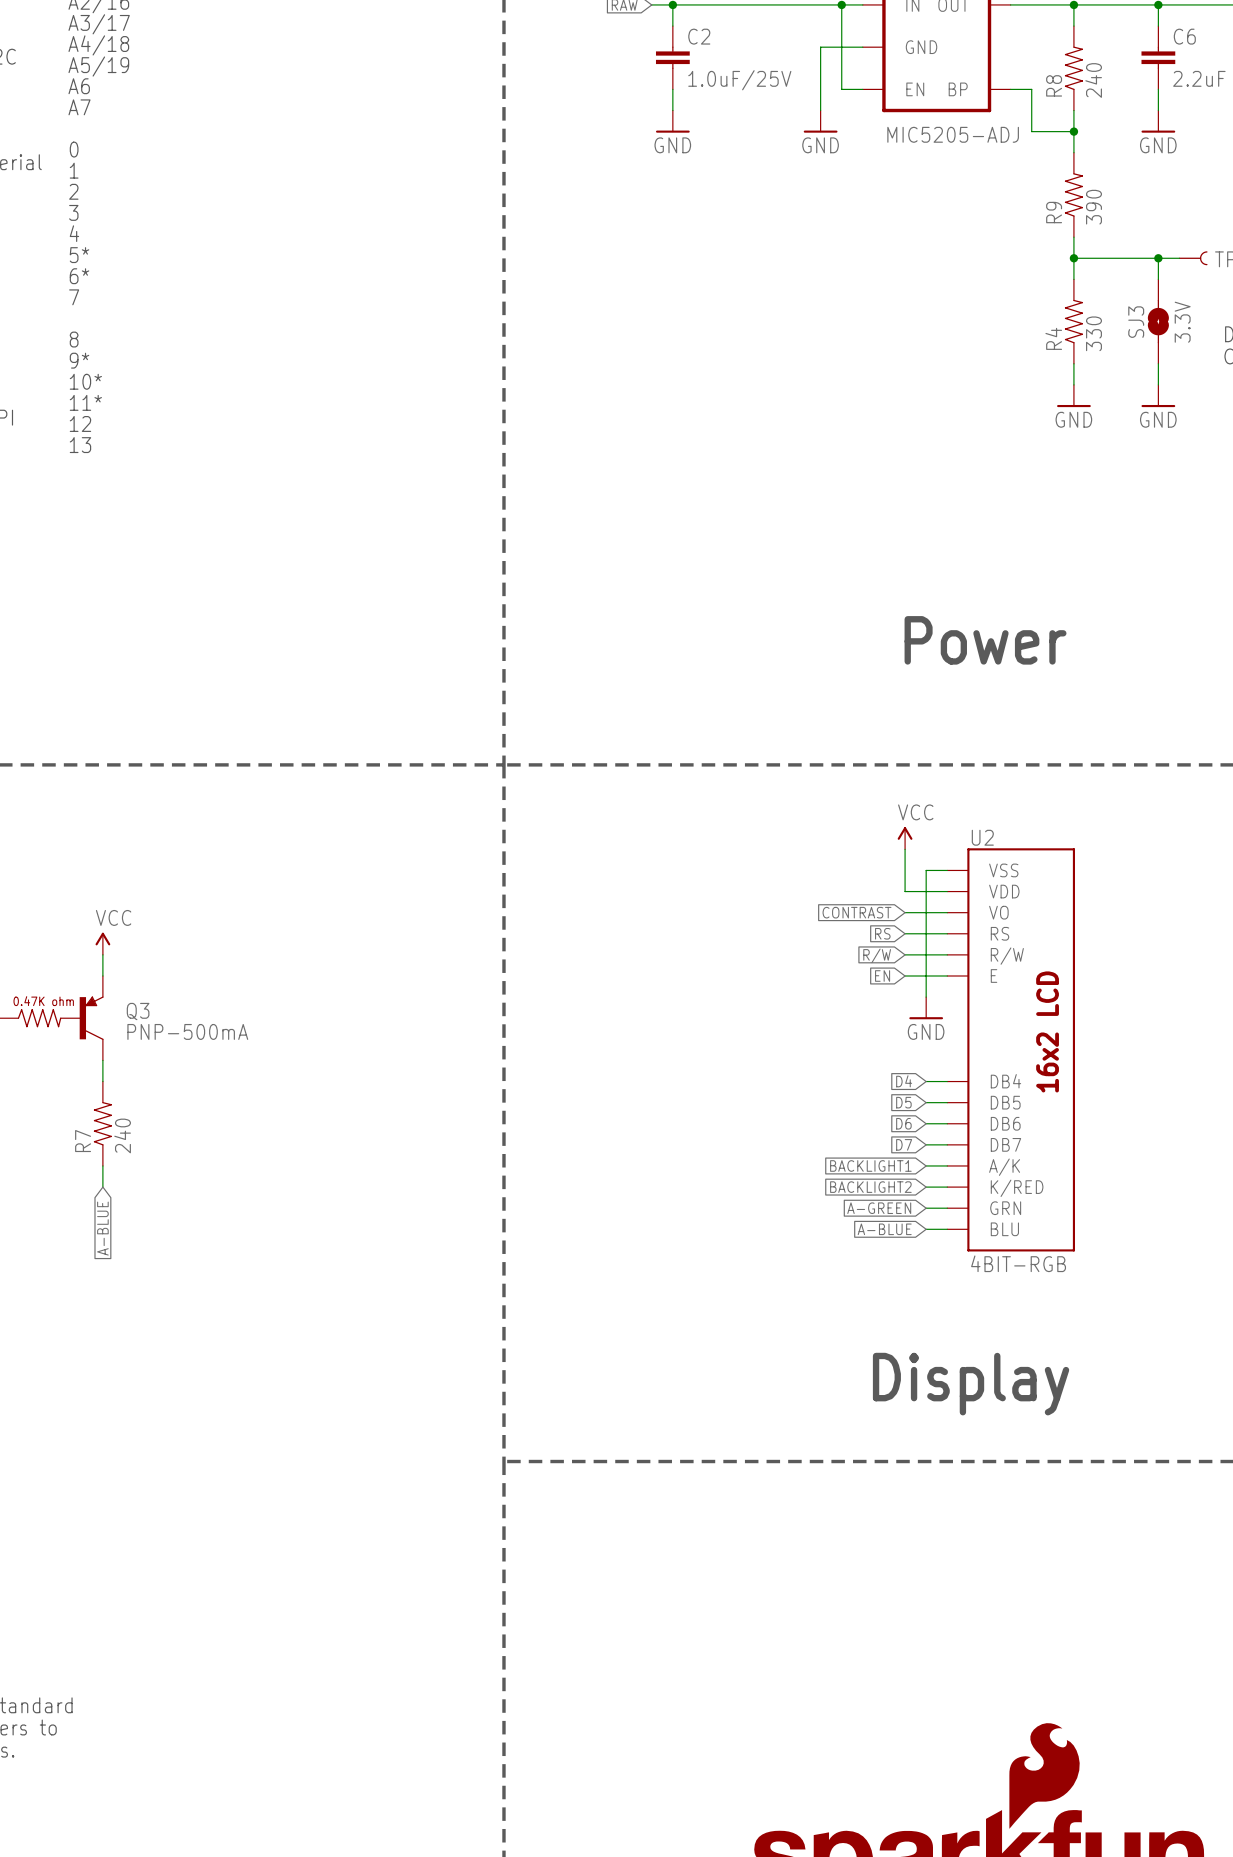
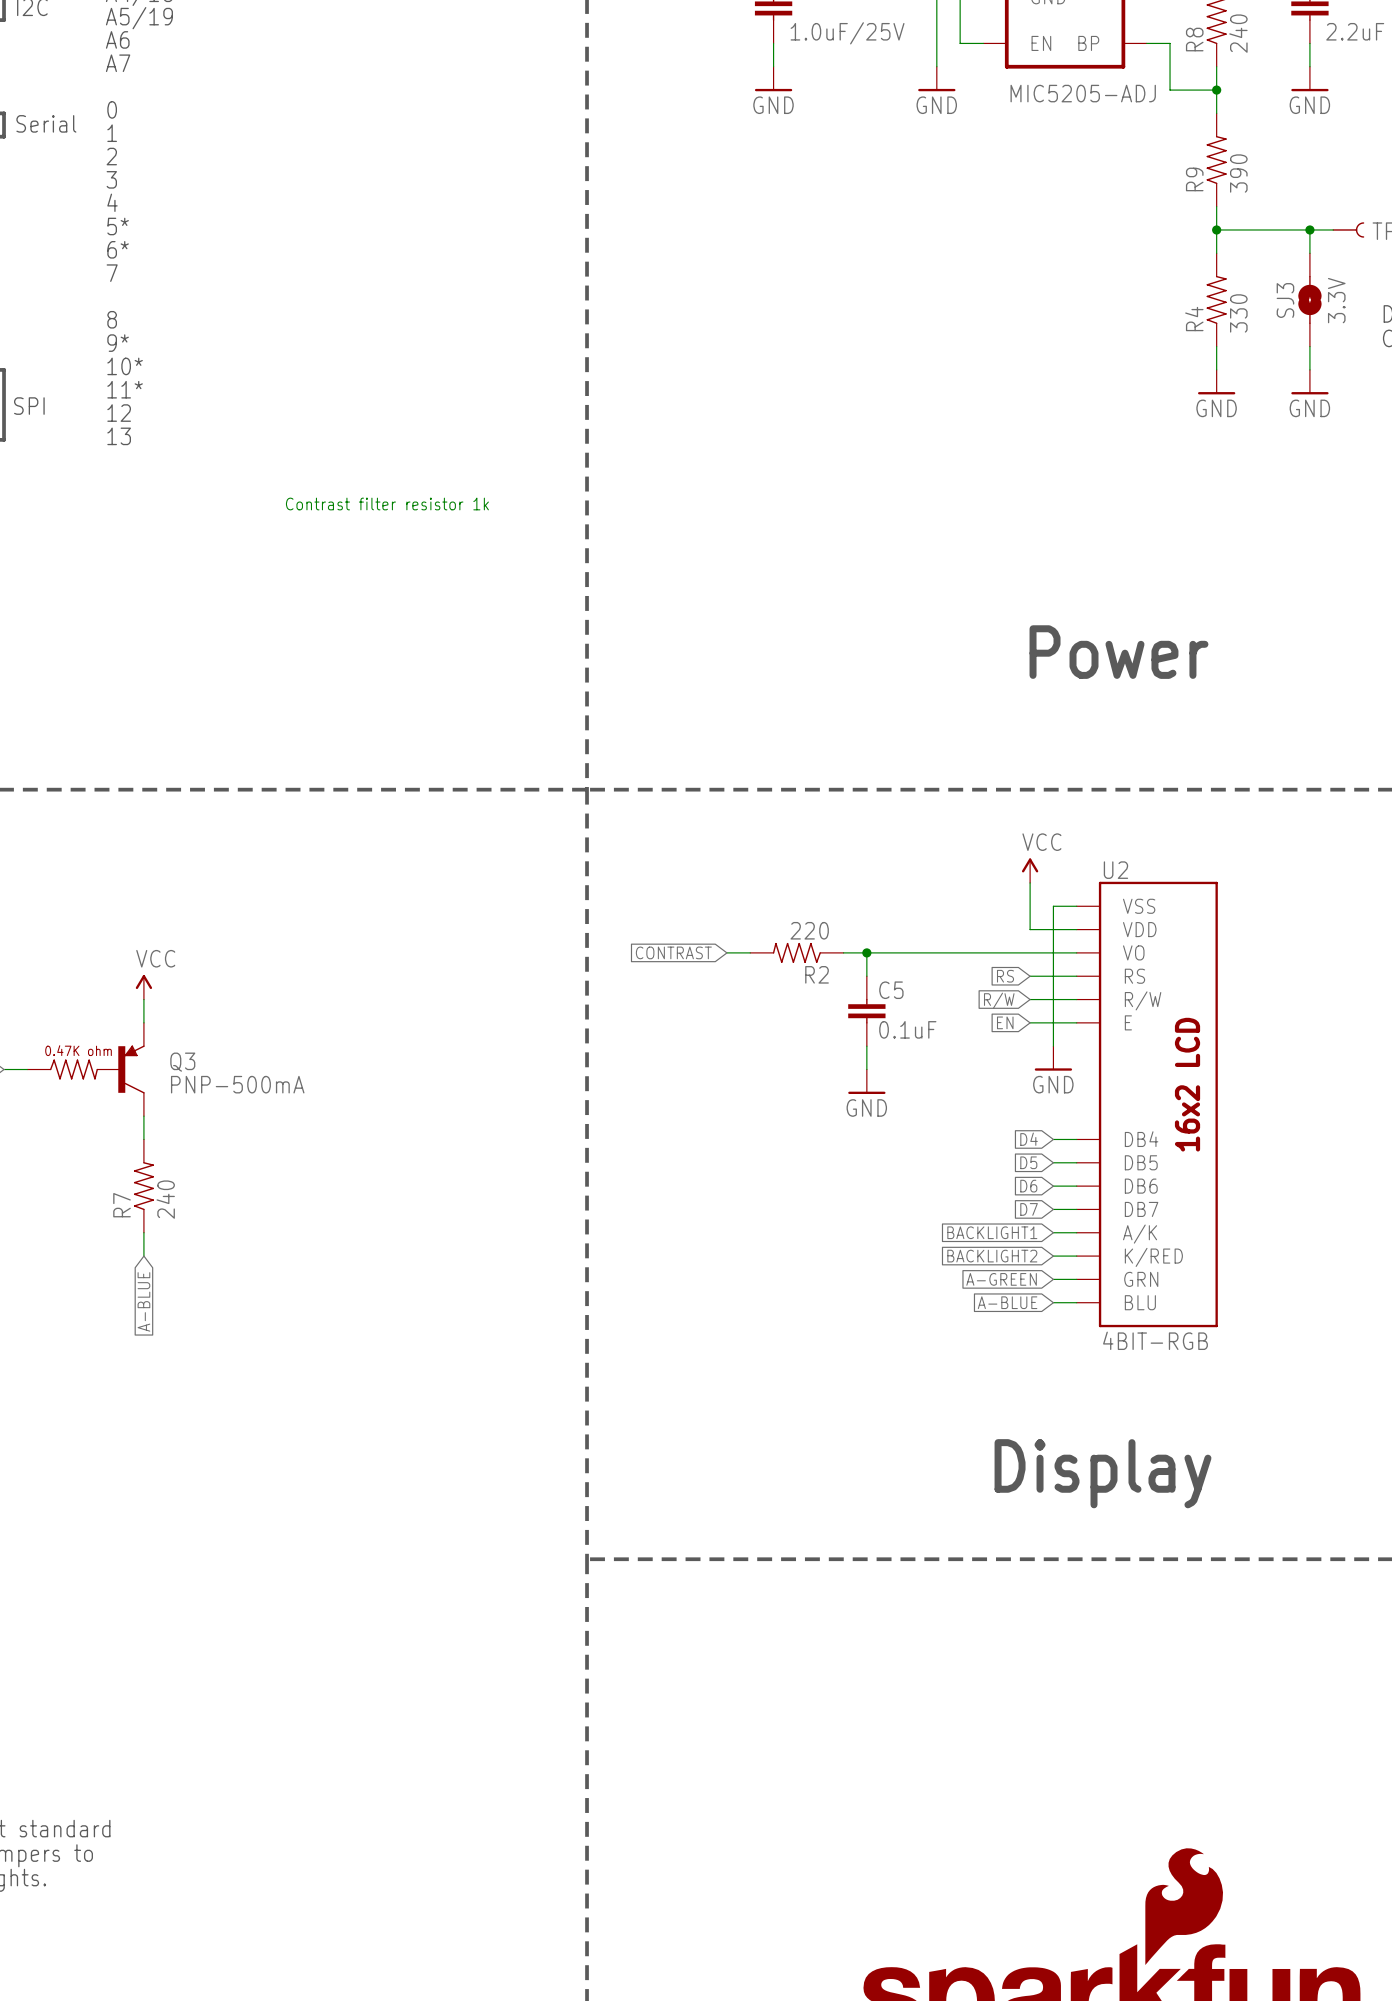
text: none -> Contrast filter resistor 1k (387, 504)
global label: none -> CONTRAST (673, 952)
wire: none -> (726, 952) (750, 952)
R2: none -> 220 (796, 952)
wire: none -> (843, 952) (1030, 952)
wire: none -> (866, 952) (866, 976)
junction: none -> (866, 952)
global label: CONTRAST (857, 912) -> none
C5: none -> 0.1uF (866, 1011)
wire: none -> (866, 1046) (866, 1069)
power symbol: none -> GND (866, 1081)

